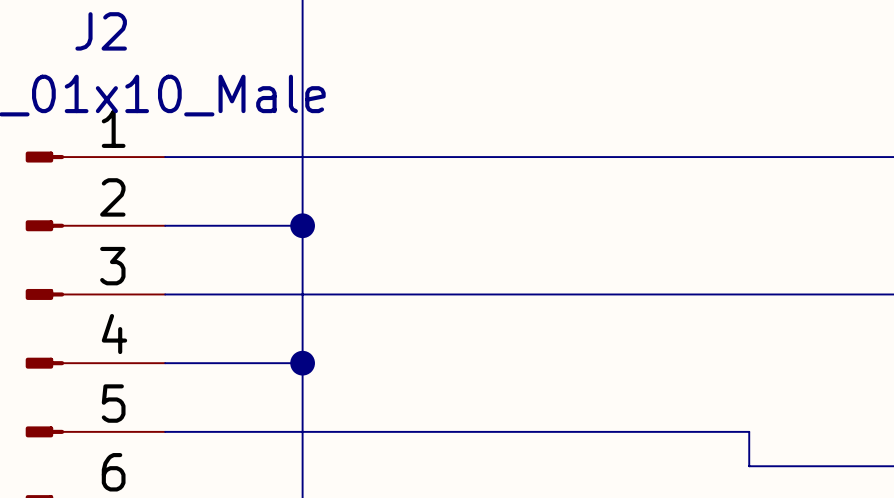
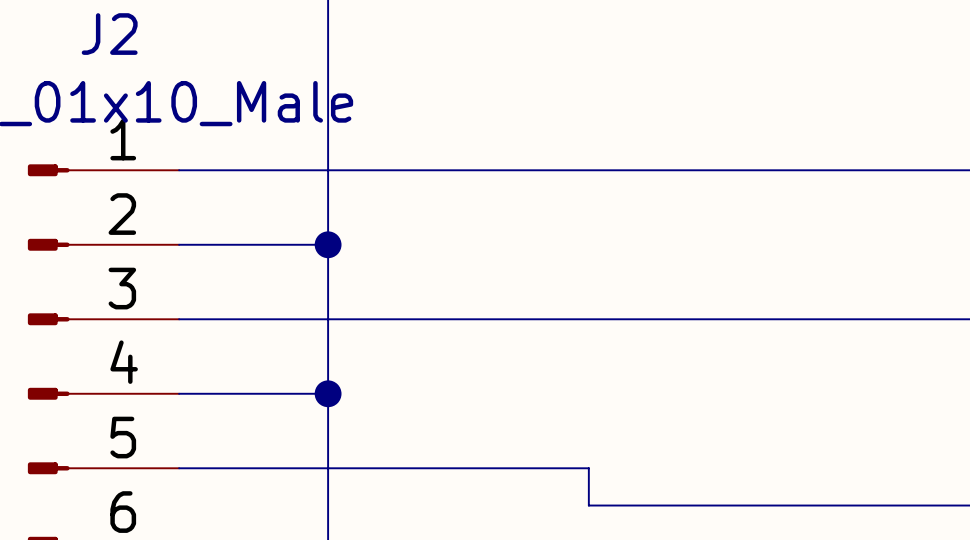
wire: (543, 431) (749, 431) (749, 466) -> (588, 468) (588, 505) (812, 505)

